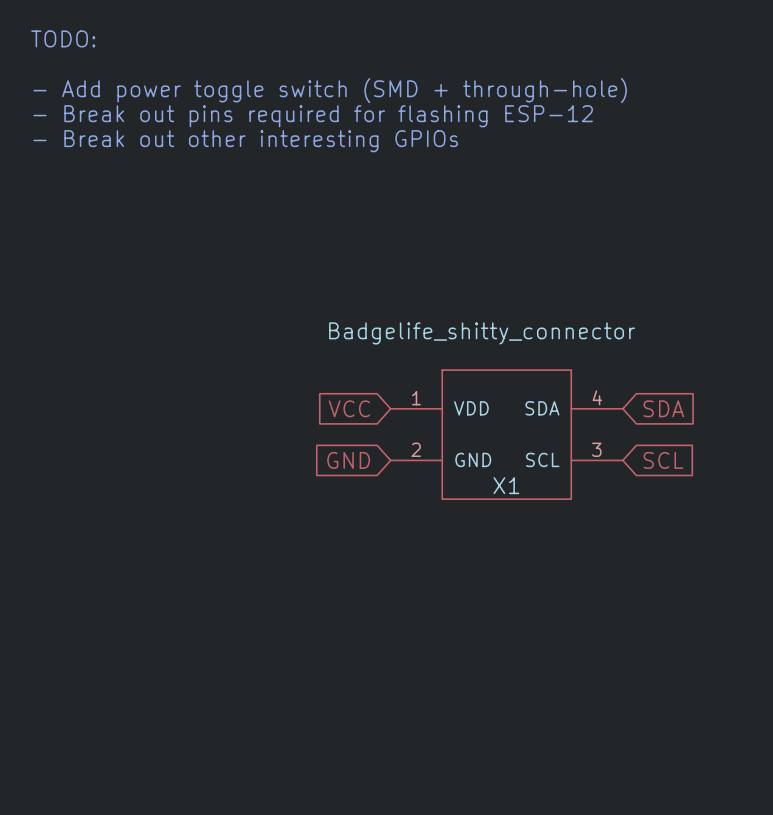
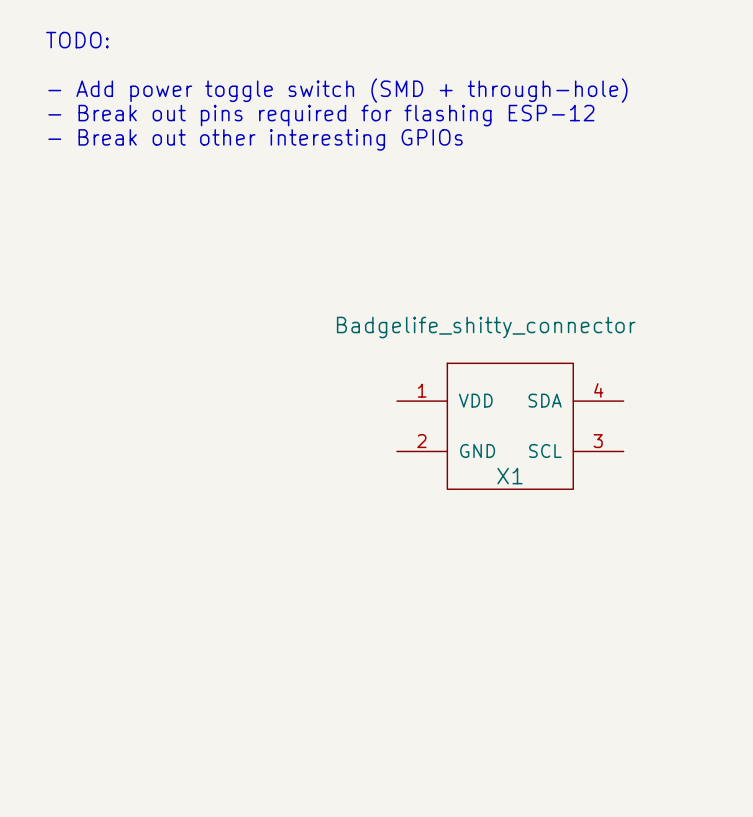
global label: VCC (349, 408) -> none
global label: SDA (663, 408) -> none
global label: GND (348, 460) -> none
global label: SCL (663, 460) -> none

